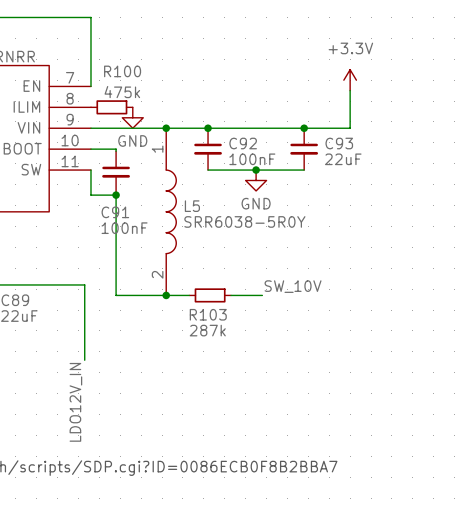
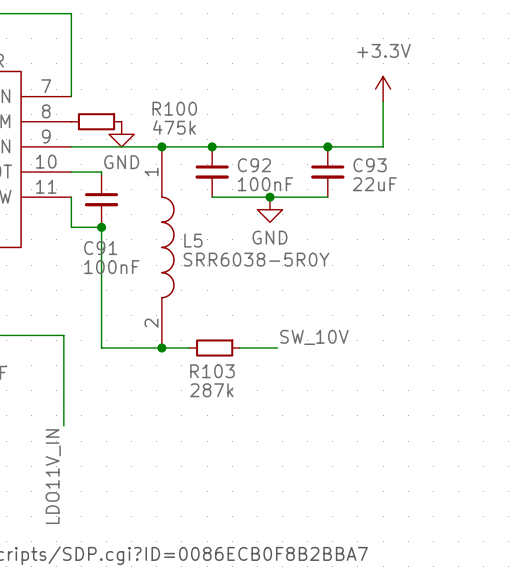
R100 name position: R100 (122, 71) -> R100 (174, 108)
R100 value position: 475k (122, 92) -> 475k (174, 127)
label: LDO12V_IN (75, 402) -> LDO11V_IN (53, 476)

